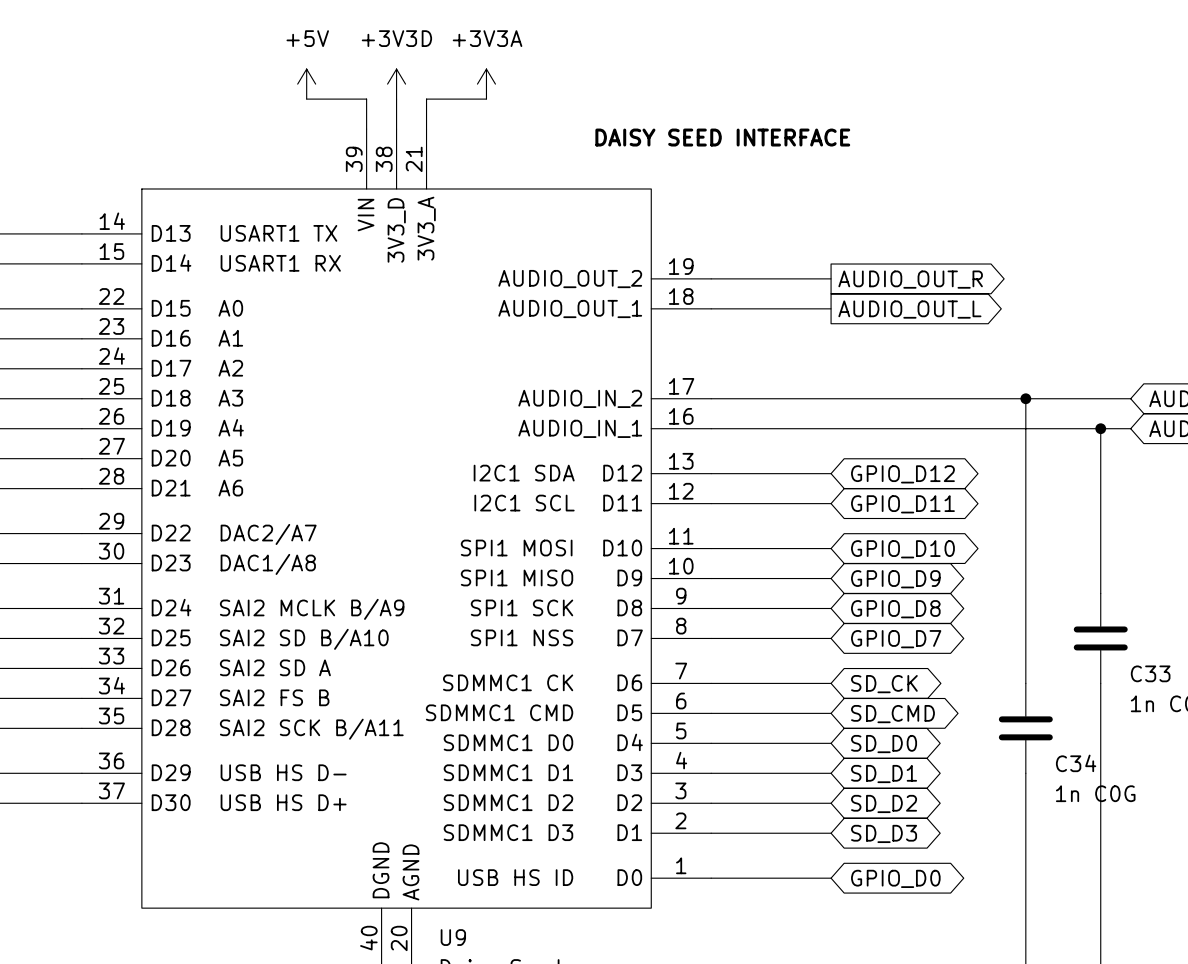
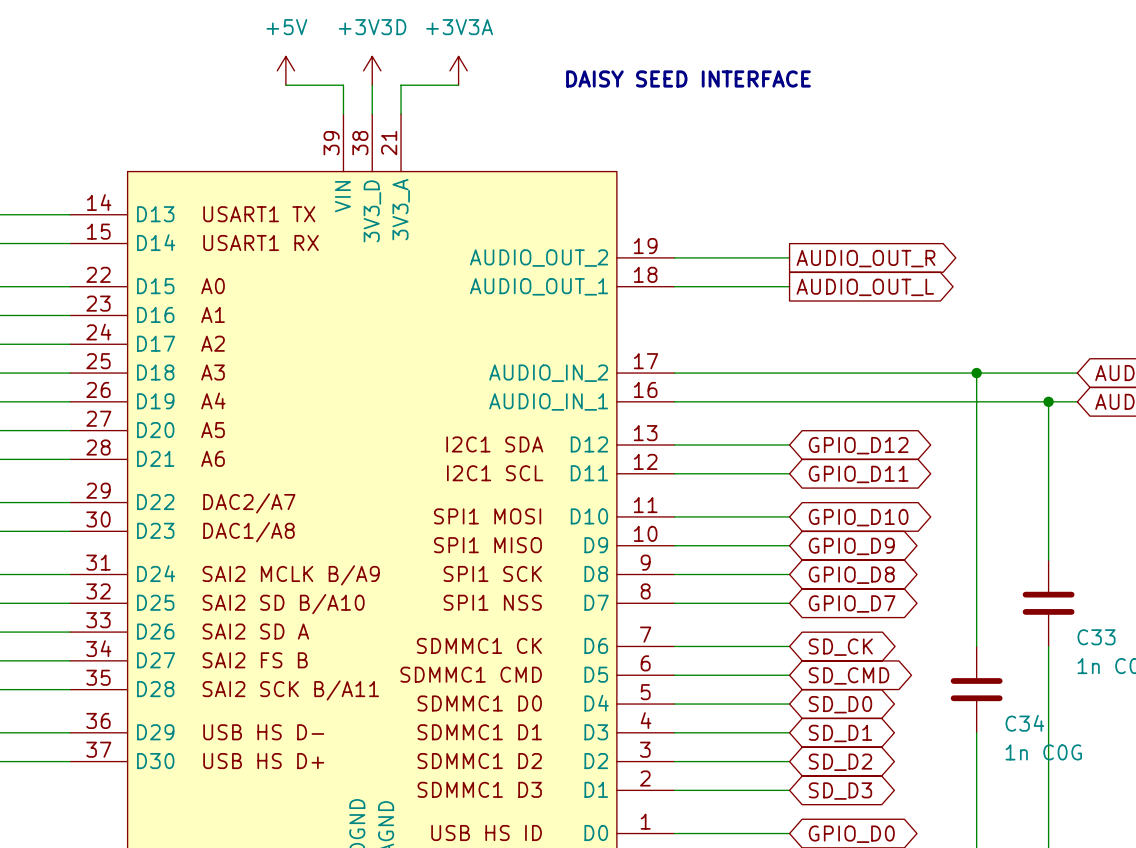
text position: DAISY SEED INTERFACE (722, 137) -> DAISY SEED INTERFACE (688, 78)

